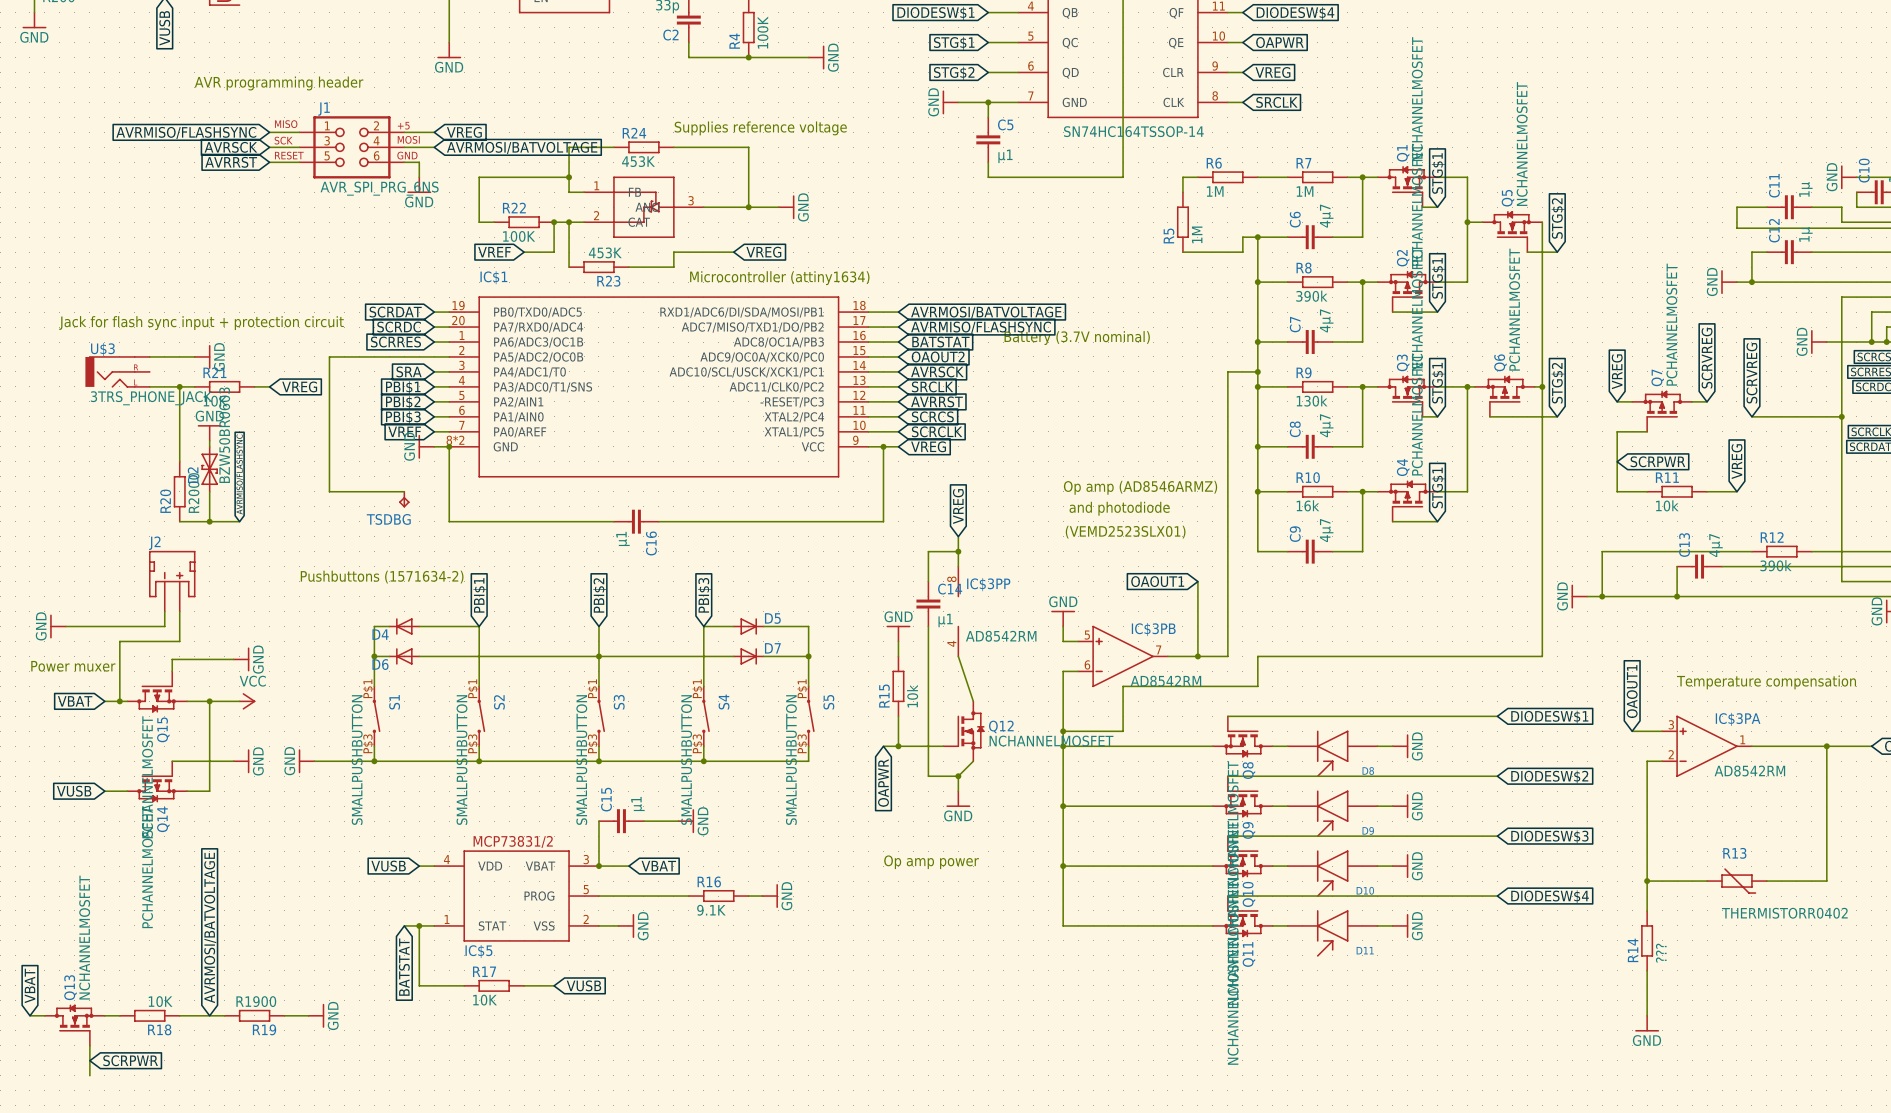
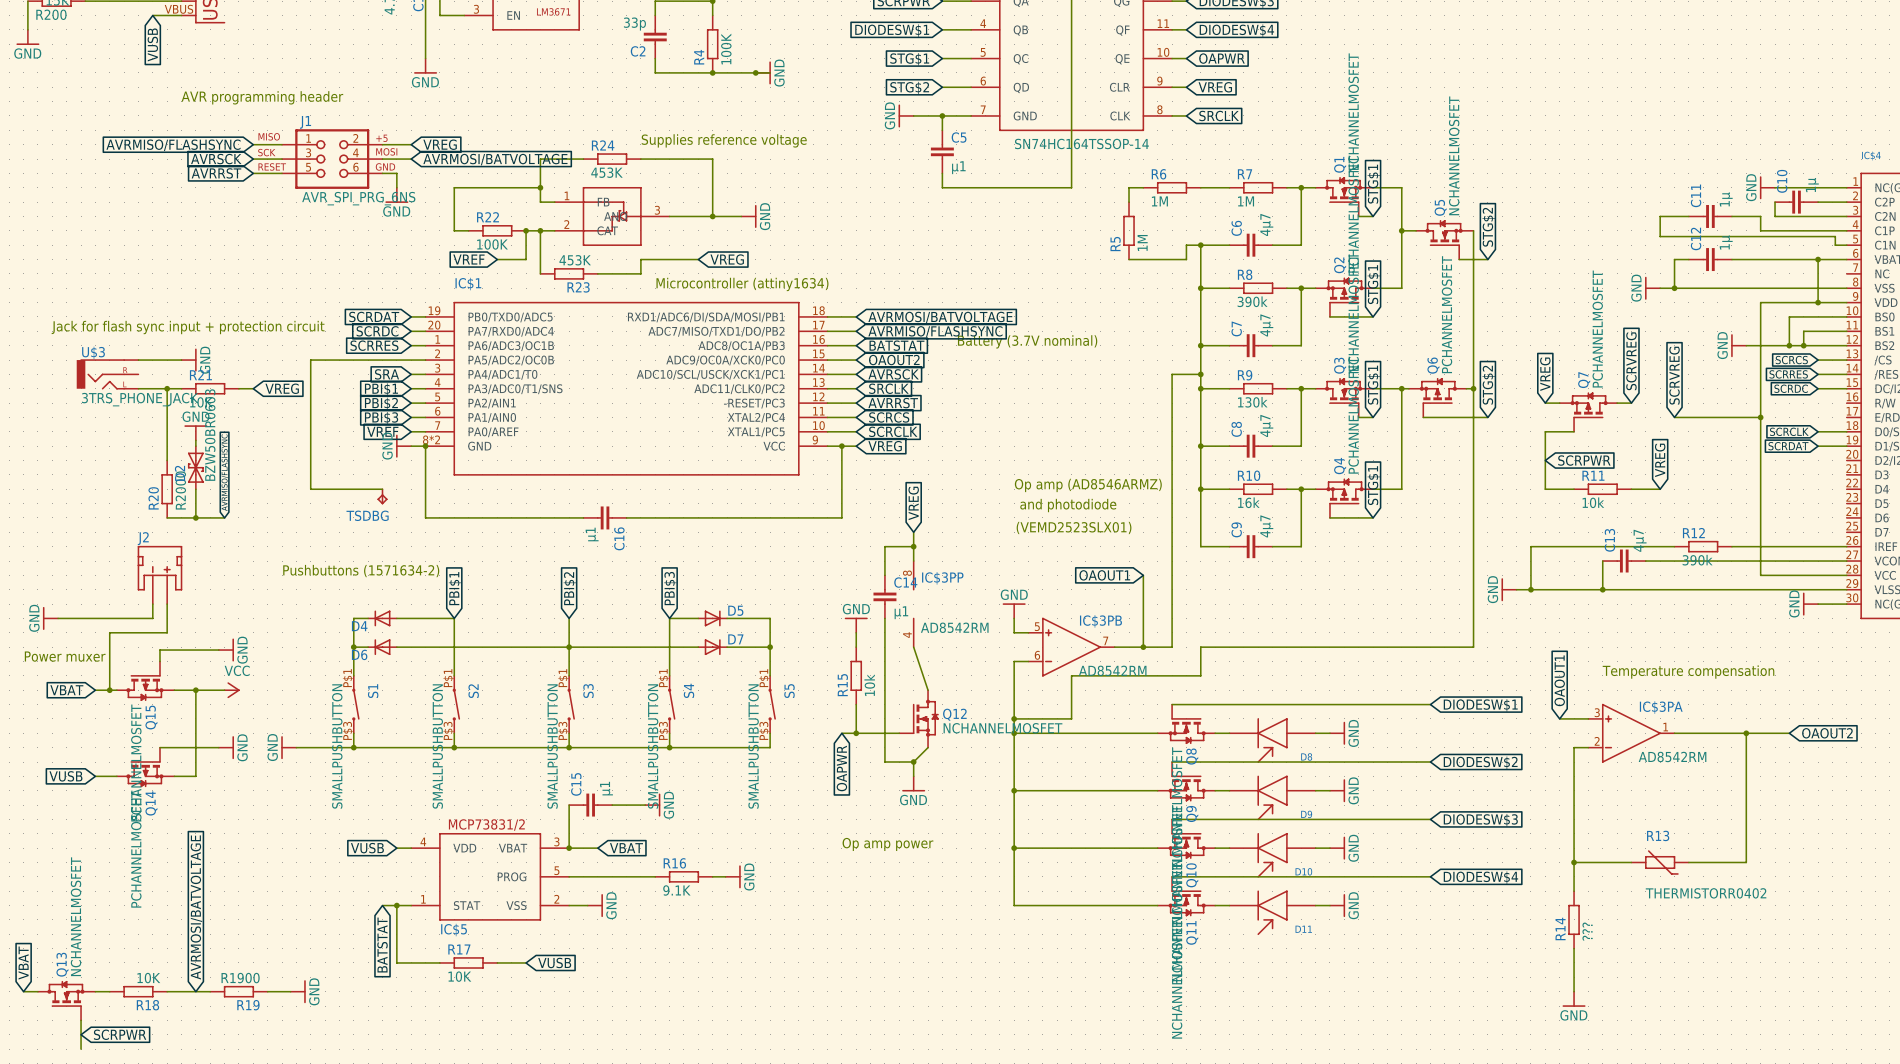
junction: none -> (755, 72)
power symbol position: GND (816, 57) -> GND (763, 72)

